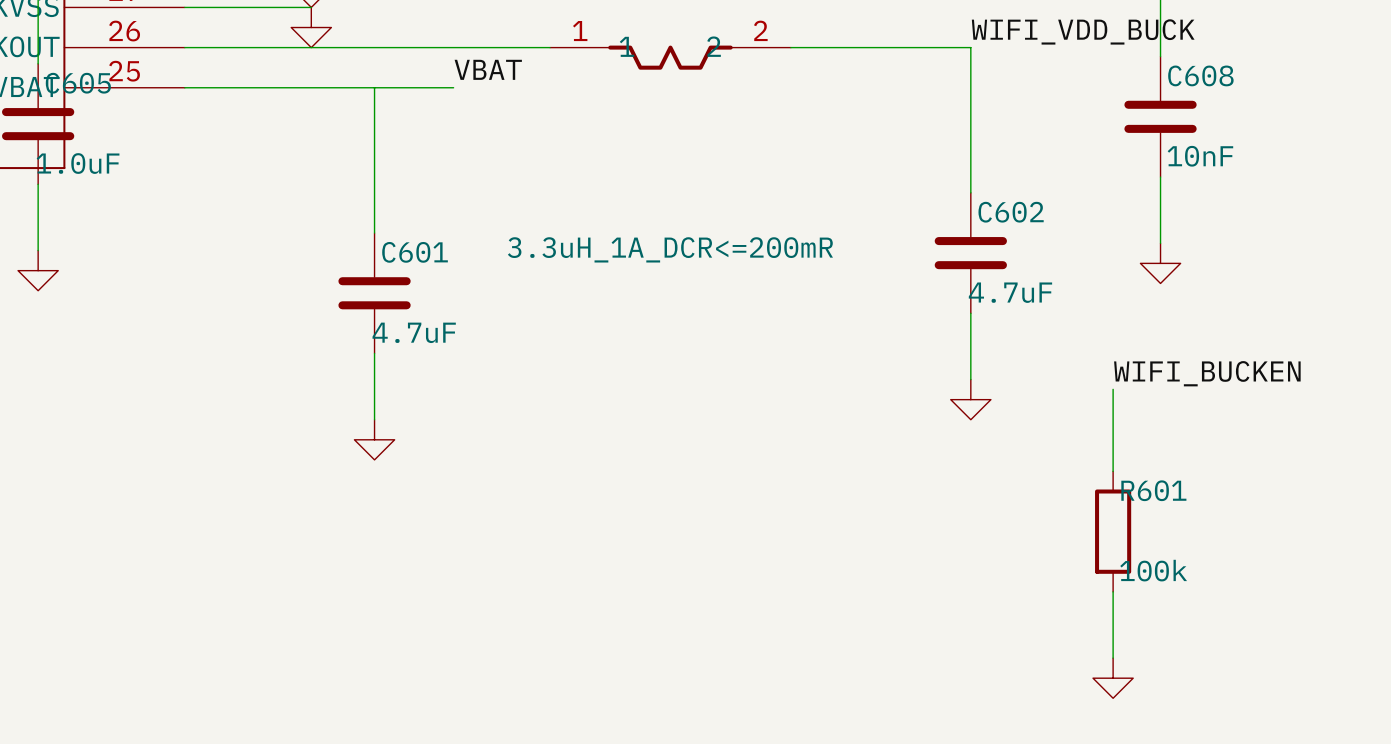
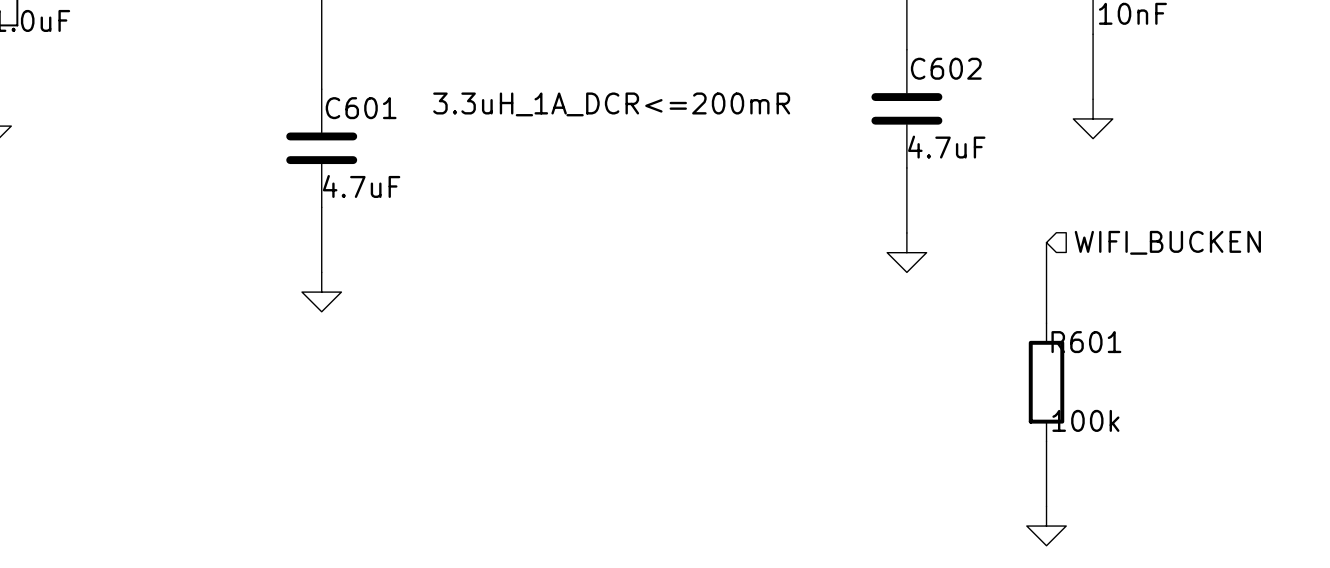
label: WIFI_BUCKEN (1207, 373) -> none
hierarchical label: none -> WIFI_BUCKEN (1167, 242)

